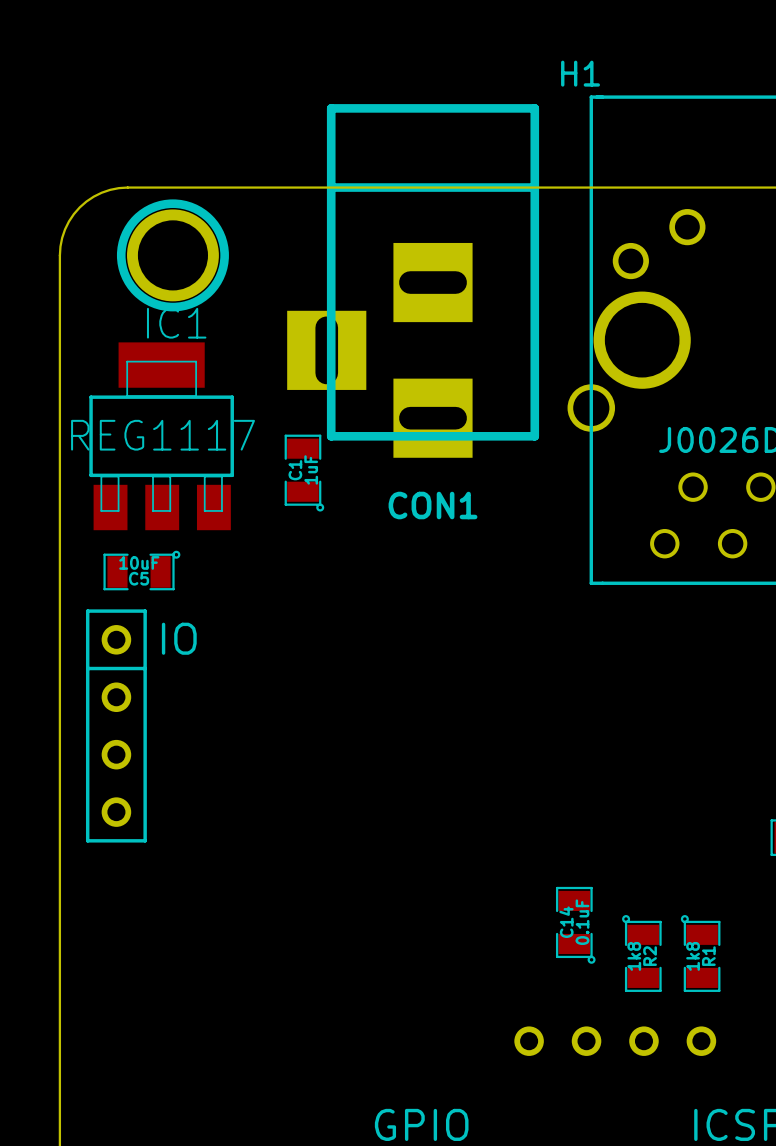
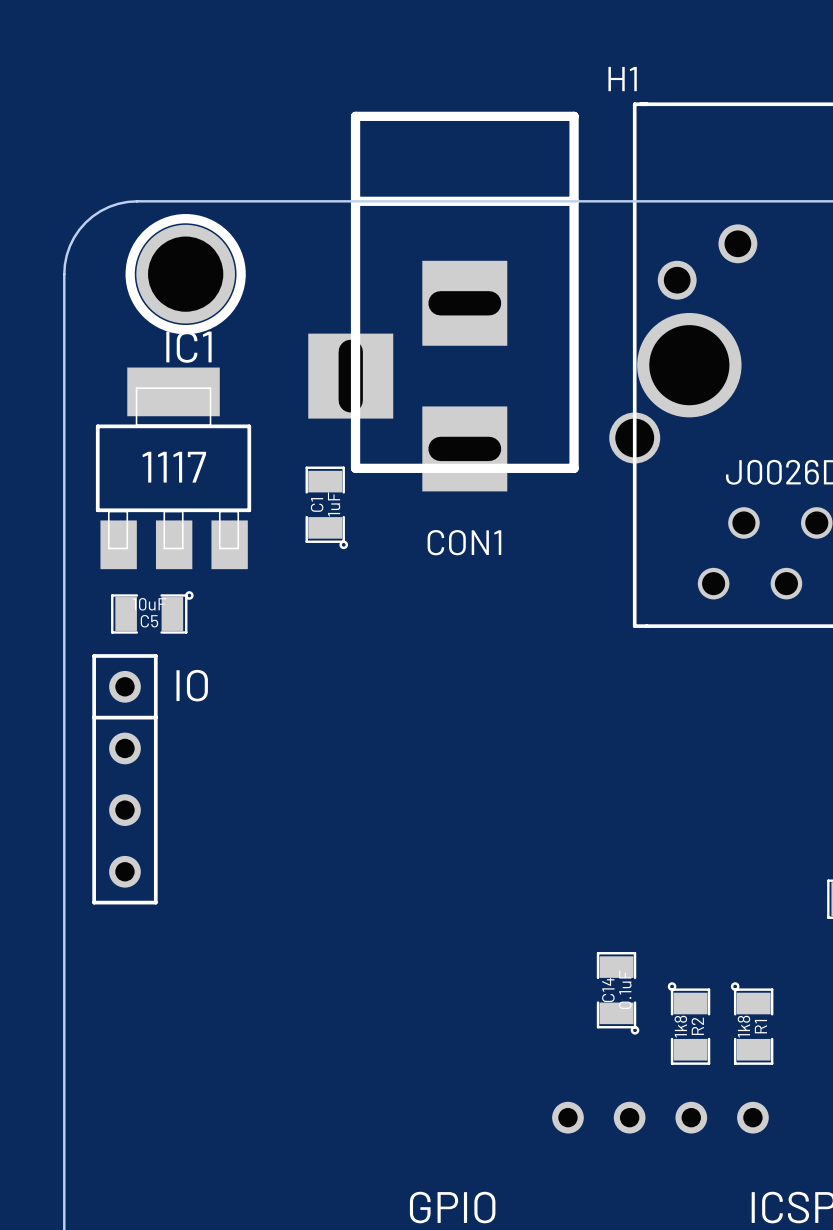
IC1 value: REG1117 (163, 435) -> 1117 (174, 467)

